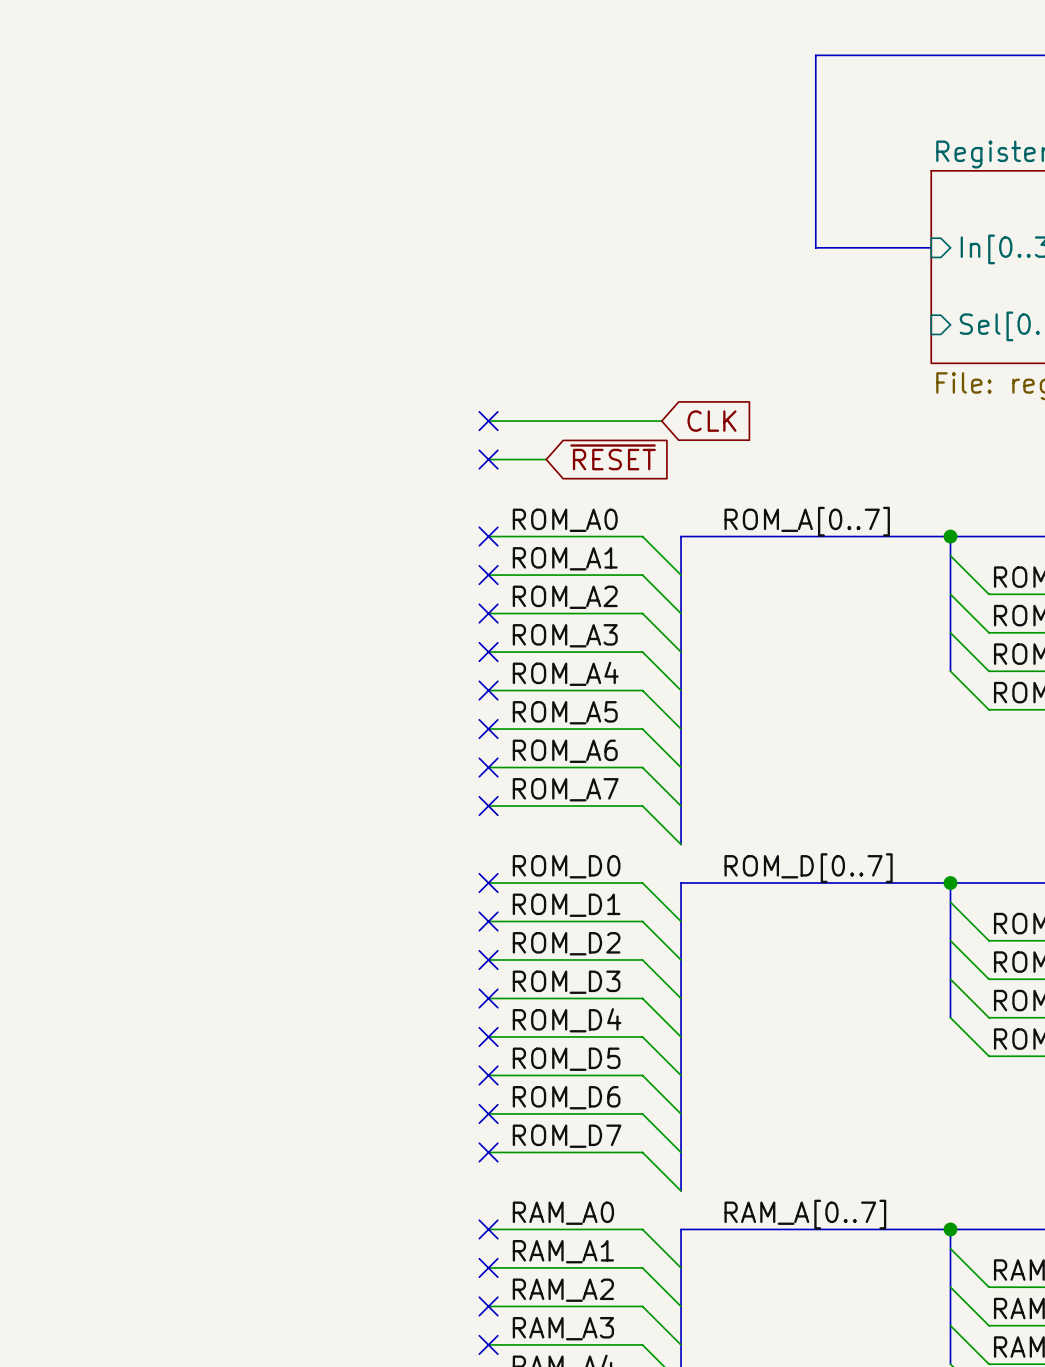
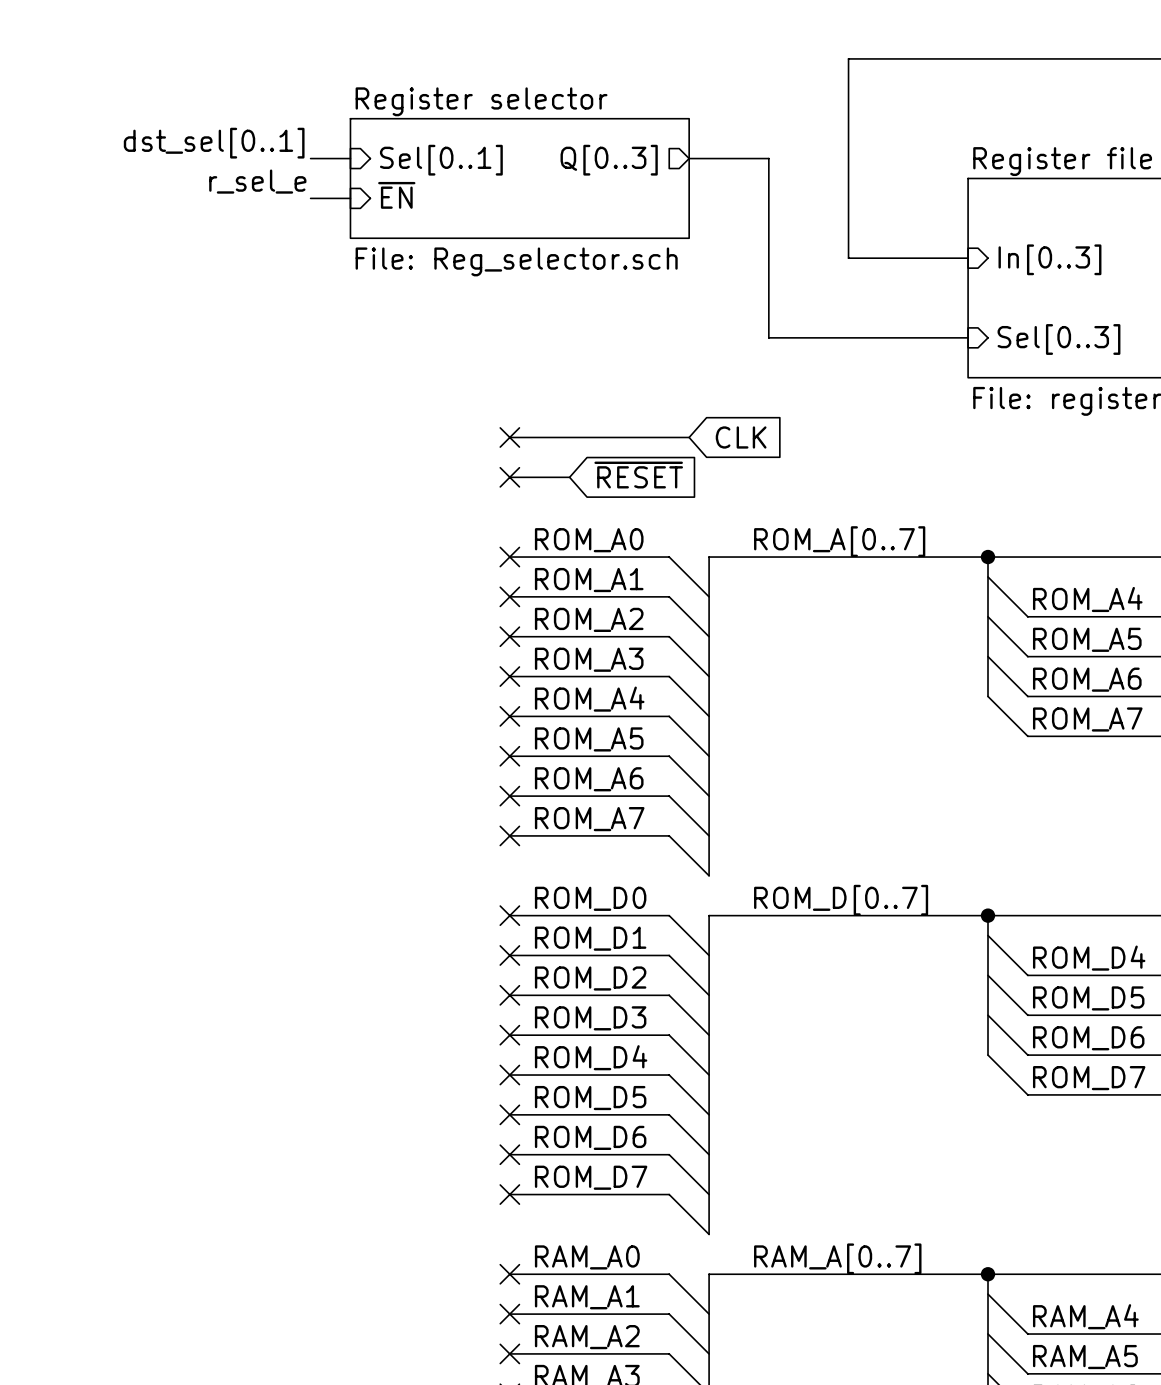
label: none -> dst_sel[0..1] (214, 143)
bus: none -> (310, 158) (350, 158)
bus: none -> (689, 158) (768, 158) (768, 337) (968, 337)
sheet pin: none -> Sel[0..1] (441, 160)
sheet pin: none -> Q[0..3] (609, 160)
sheet Register selector: none -> File: Reg_selector.sch (519, 178)
label: none -> r_sel_e (257, 181)
sheet pin: none -> ~{EN} (396, 195)
wire: none -> (310, 198) (350, 198)

